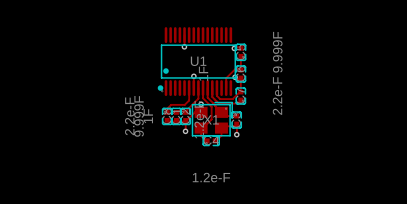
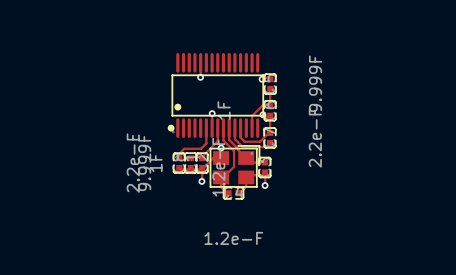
U1 name: U1 (198, 61) -> none
X1 name: X1 (211, 119) -> none

